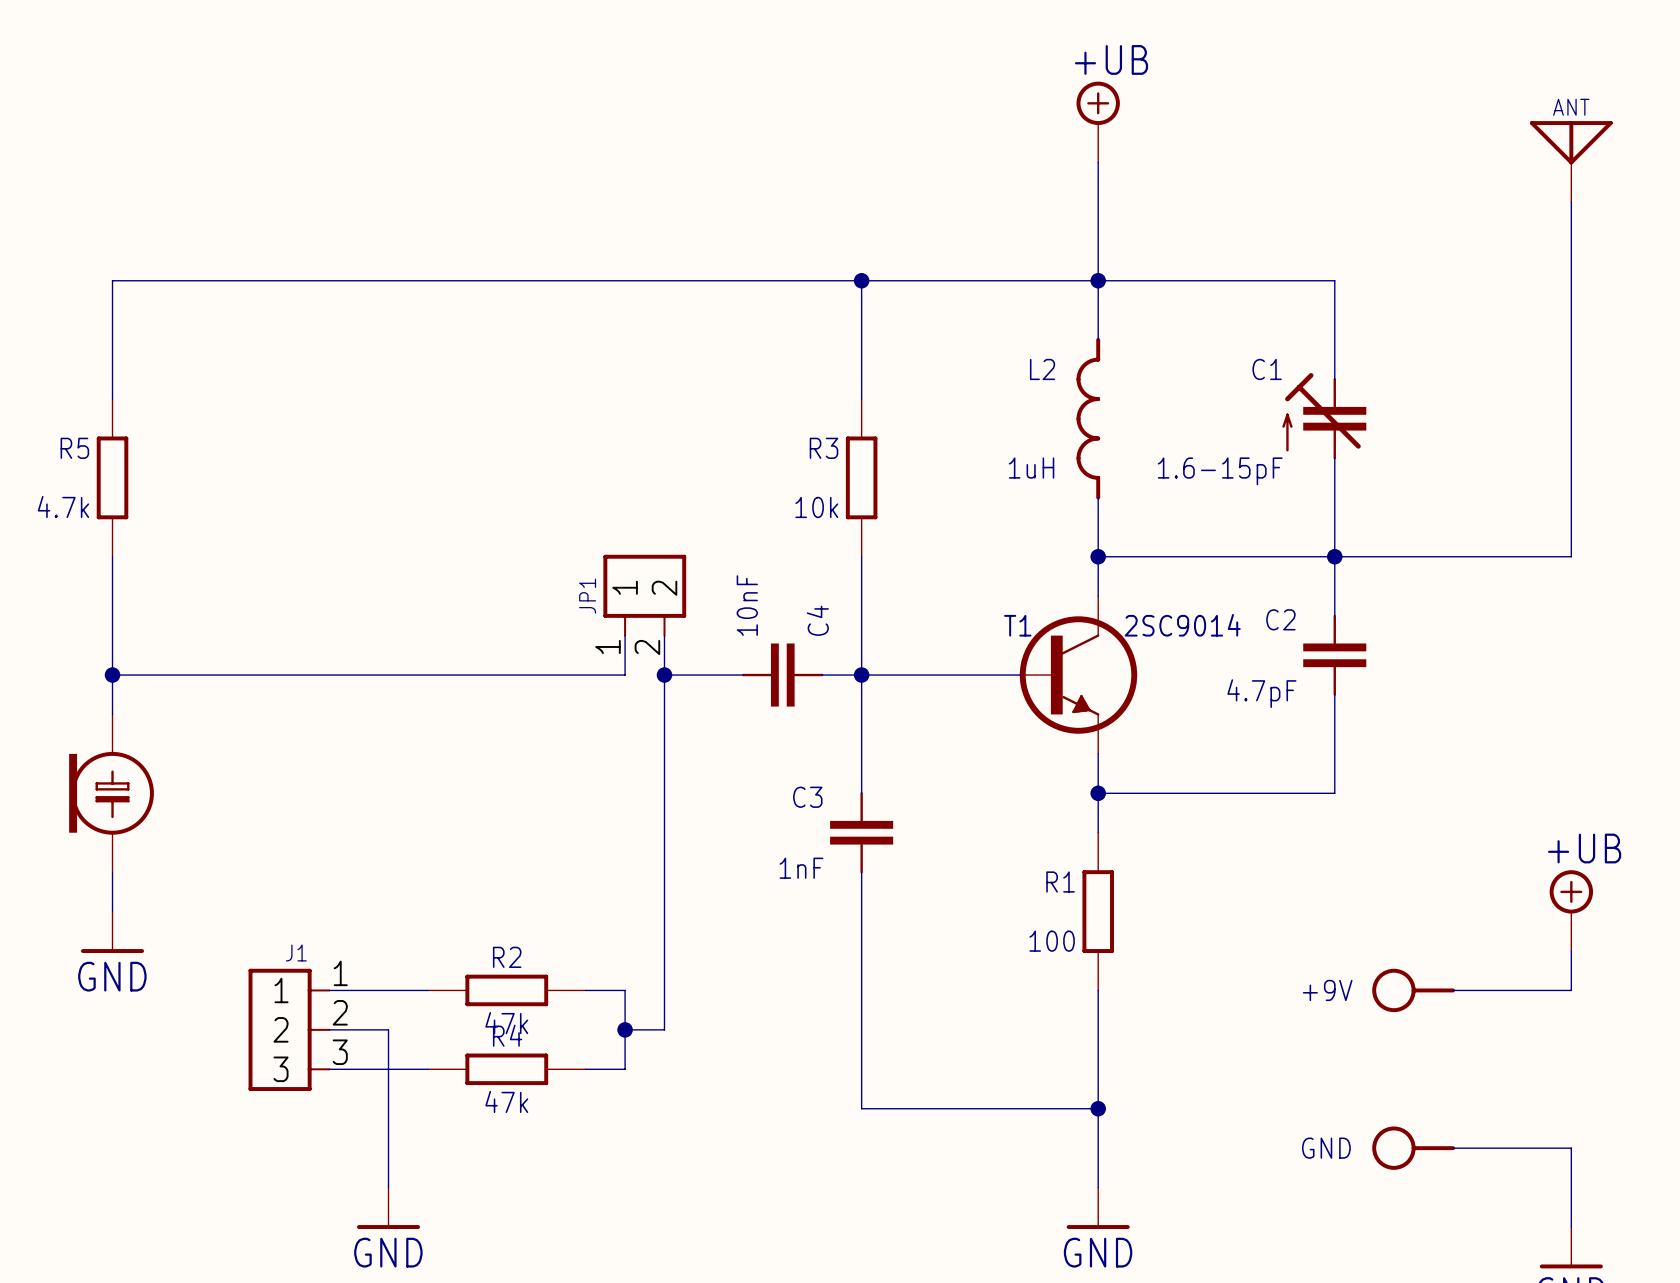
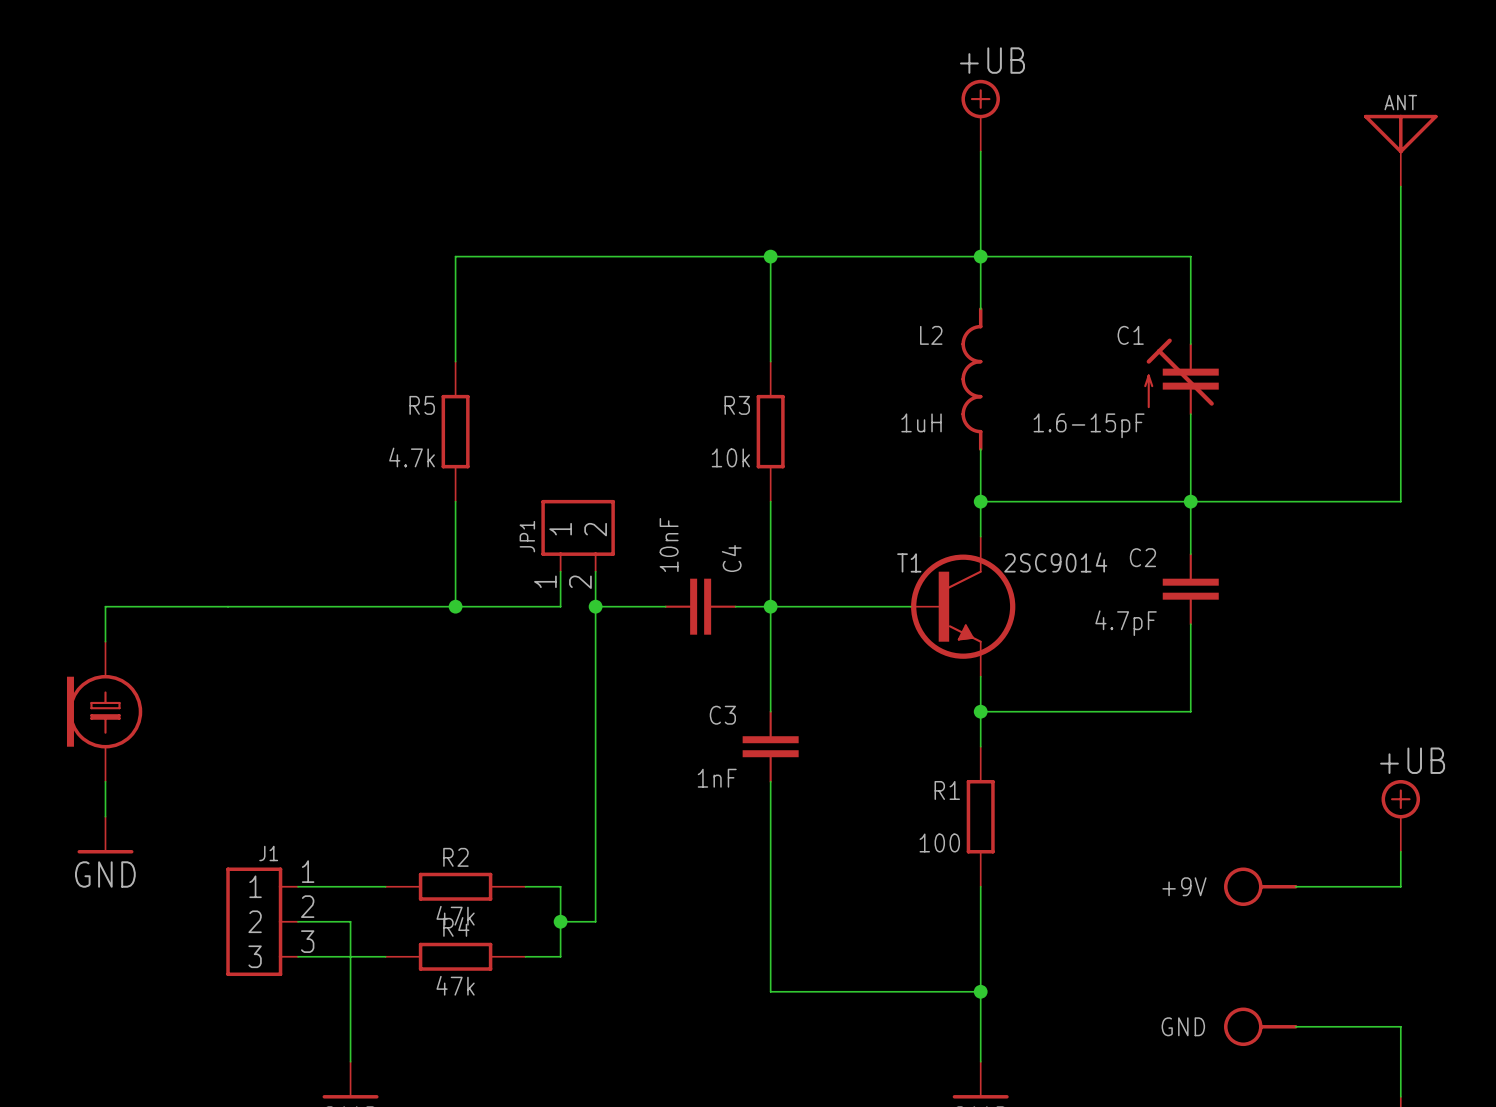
wire: (506, 280) (112, 280) (112, 399) -> (455, 256) (455, 361)
R5 position: (112, 477) -> (455, 431)
wire: (112, 556) (112, 675) -> none
wire: none -> (455, 501) (455, 606)
junction: (112, 675) -> none
junction: none -> (455, 606)

